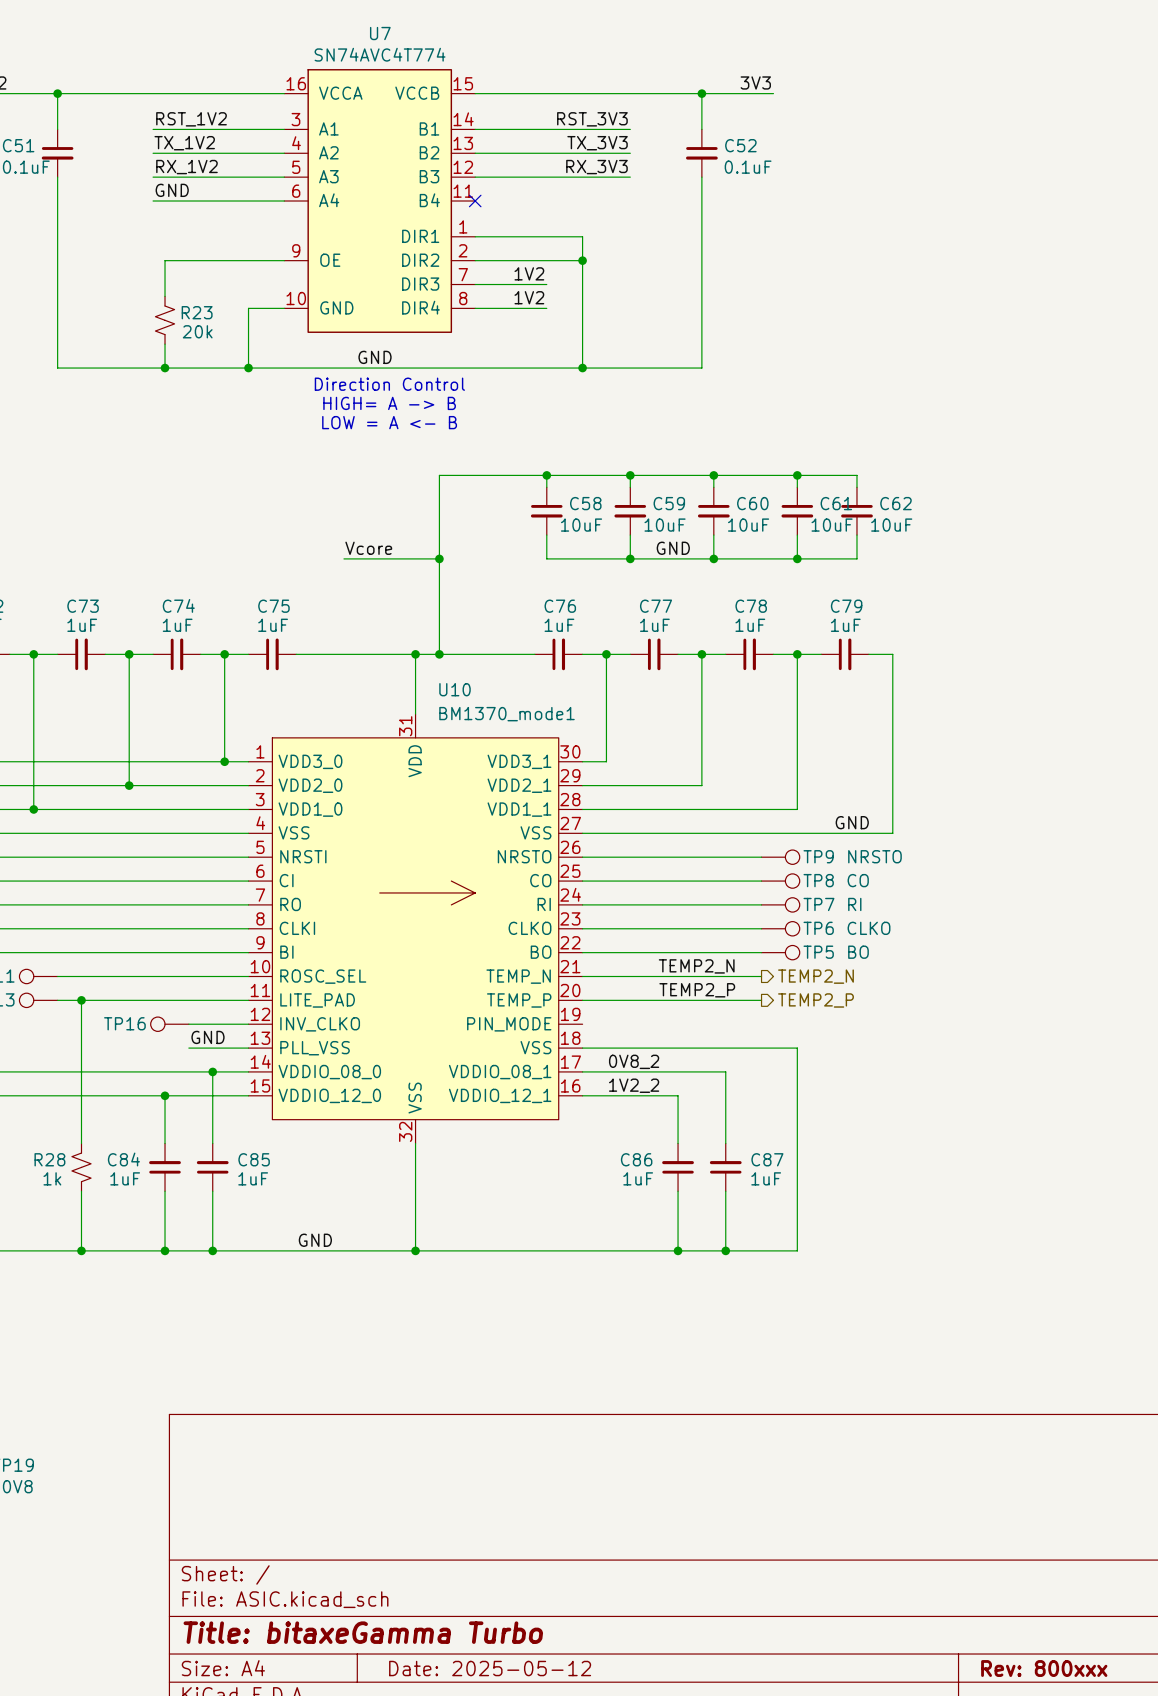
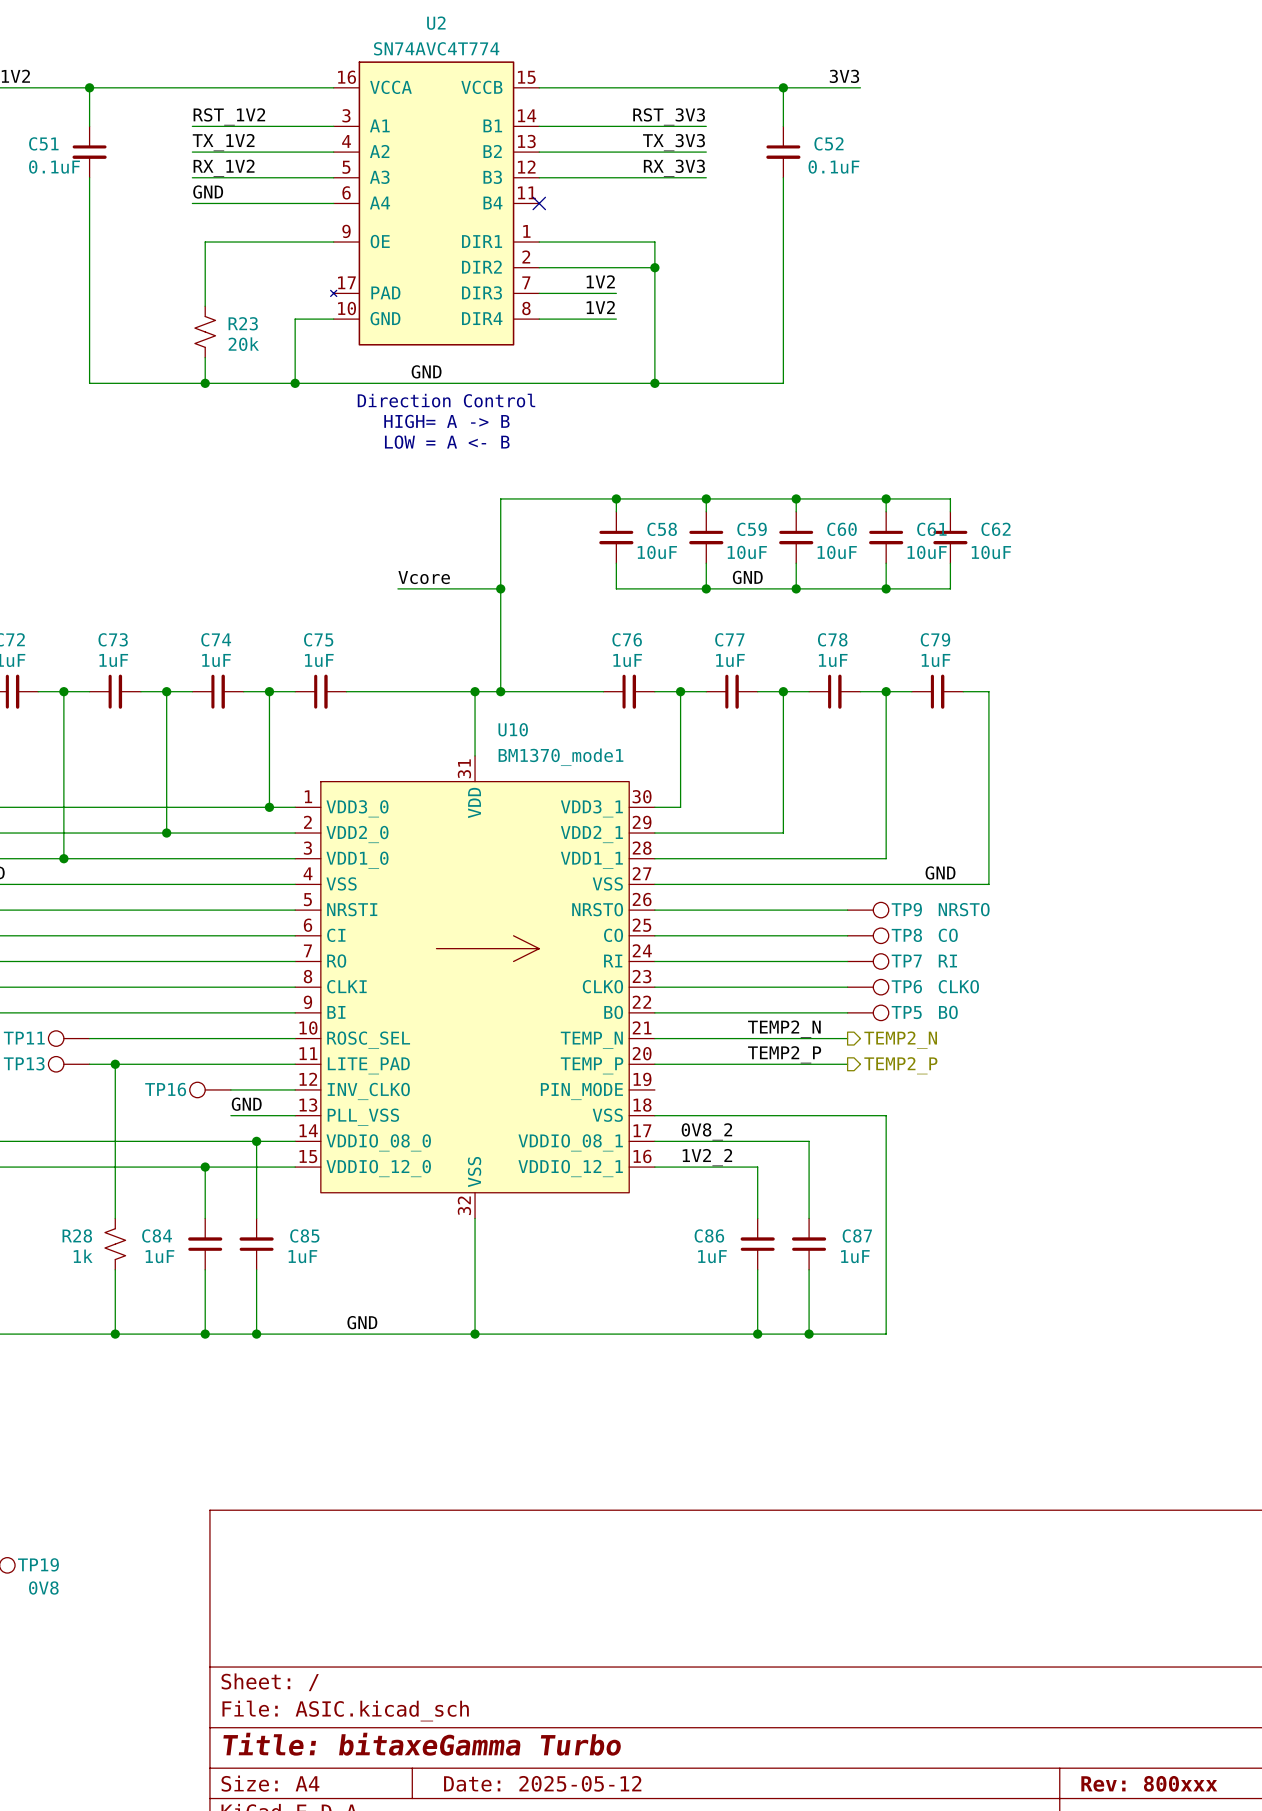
U2: none -> SN74AVC4T774 (434, 203)
U7: SN74AVC4T774 (379, 201) -> none
wire: (165, 260) (284, 260) -> (205, 267) (205, 242) (333, 242)

